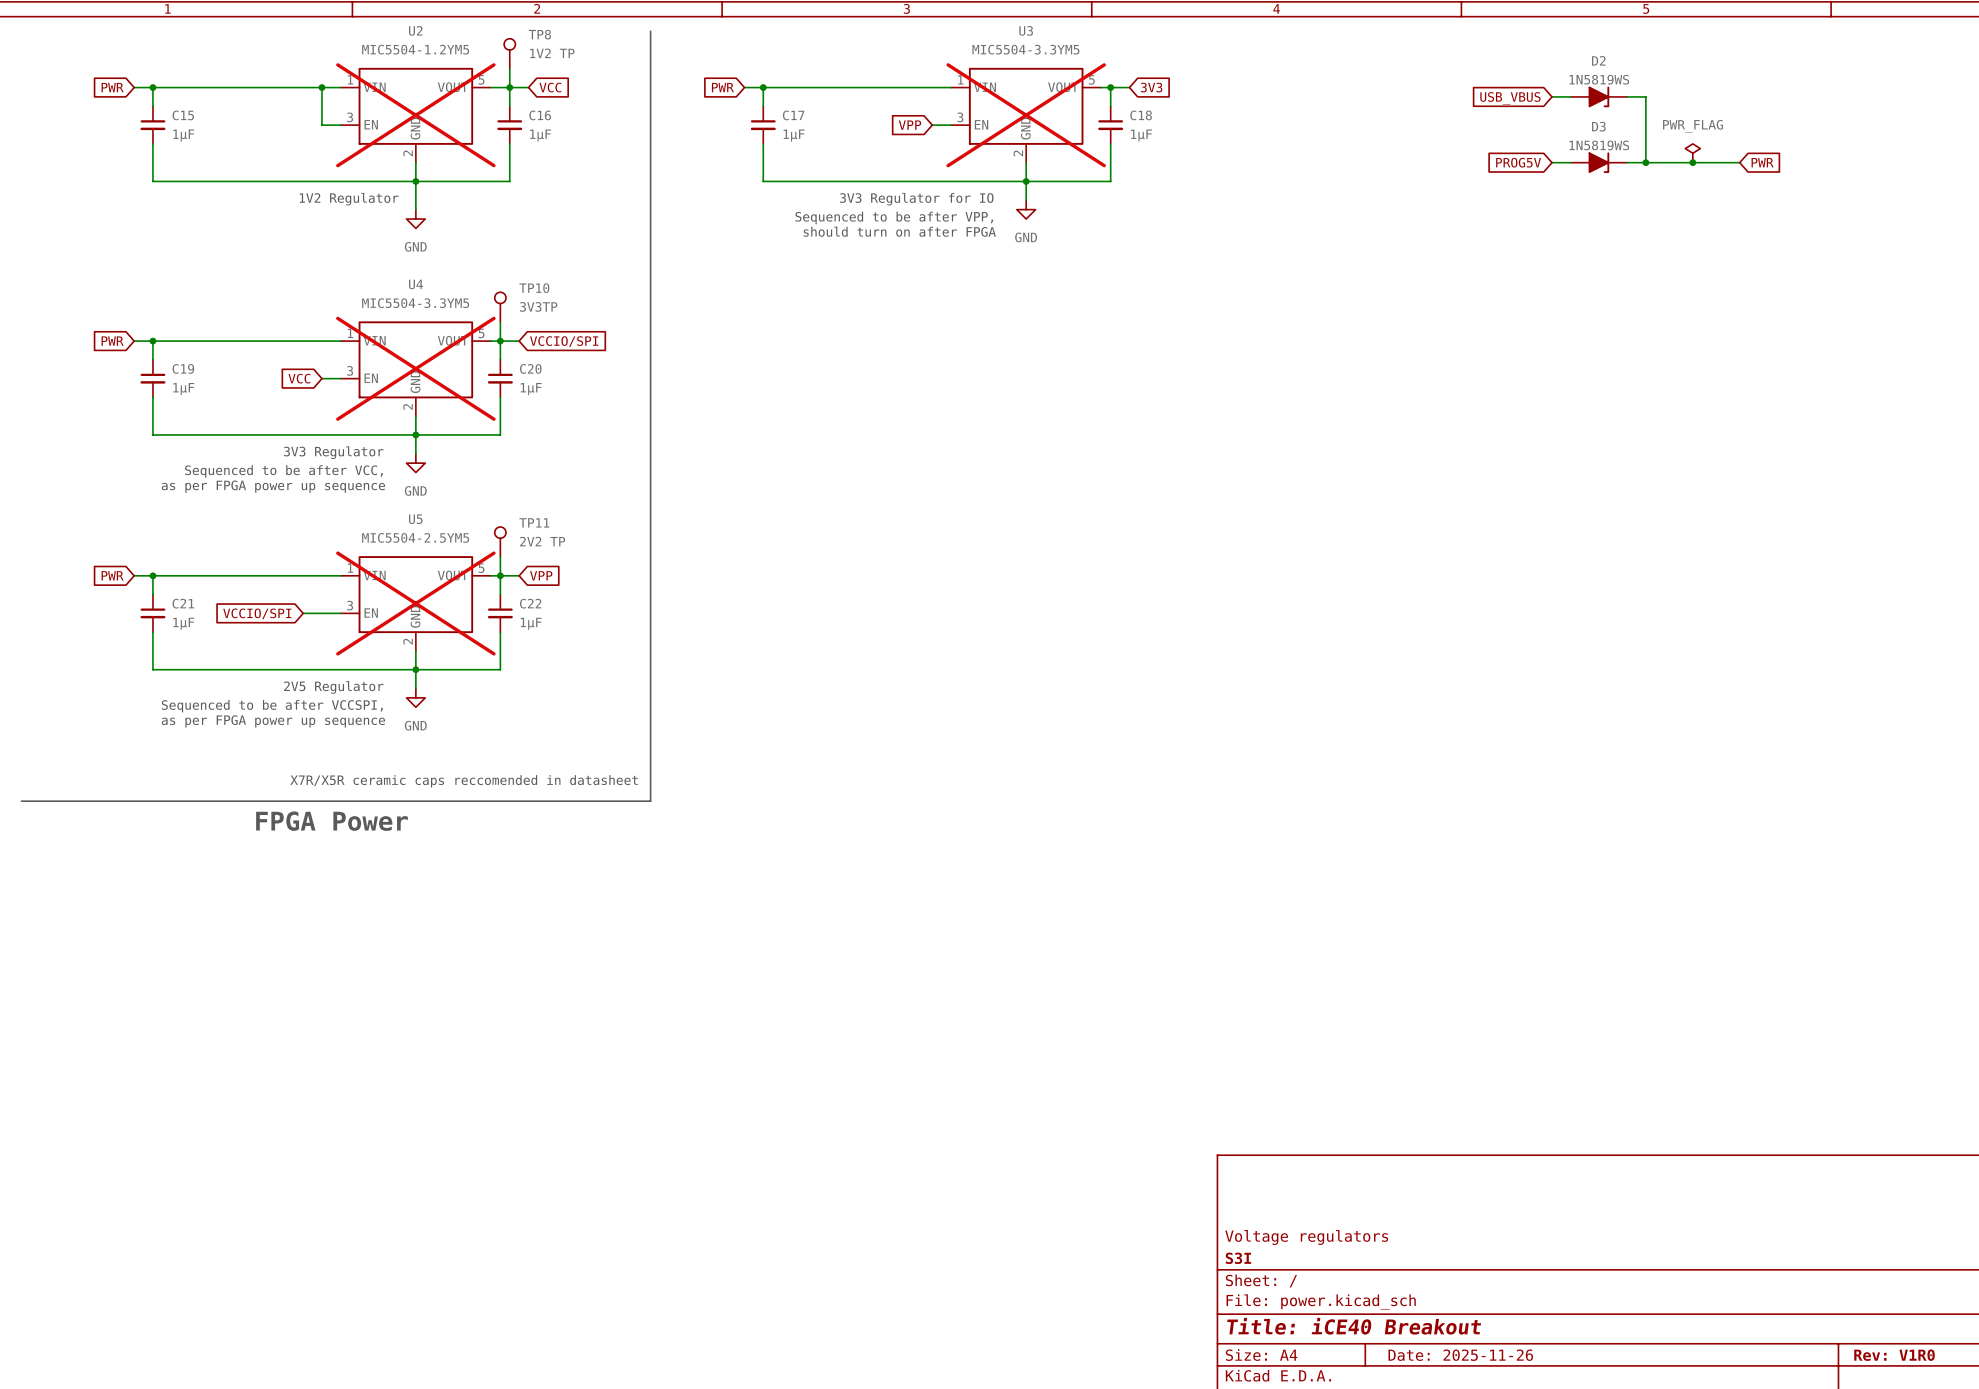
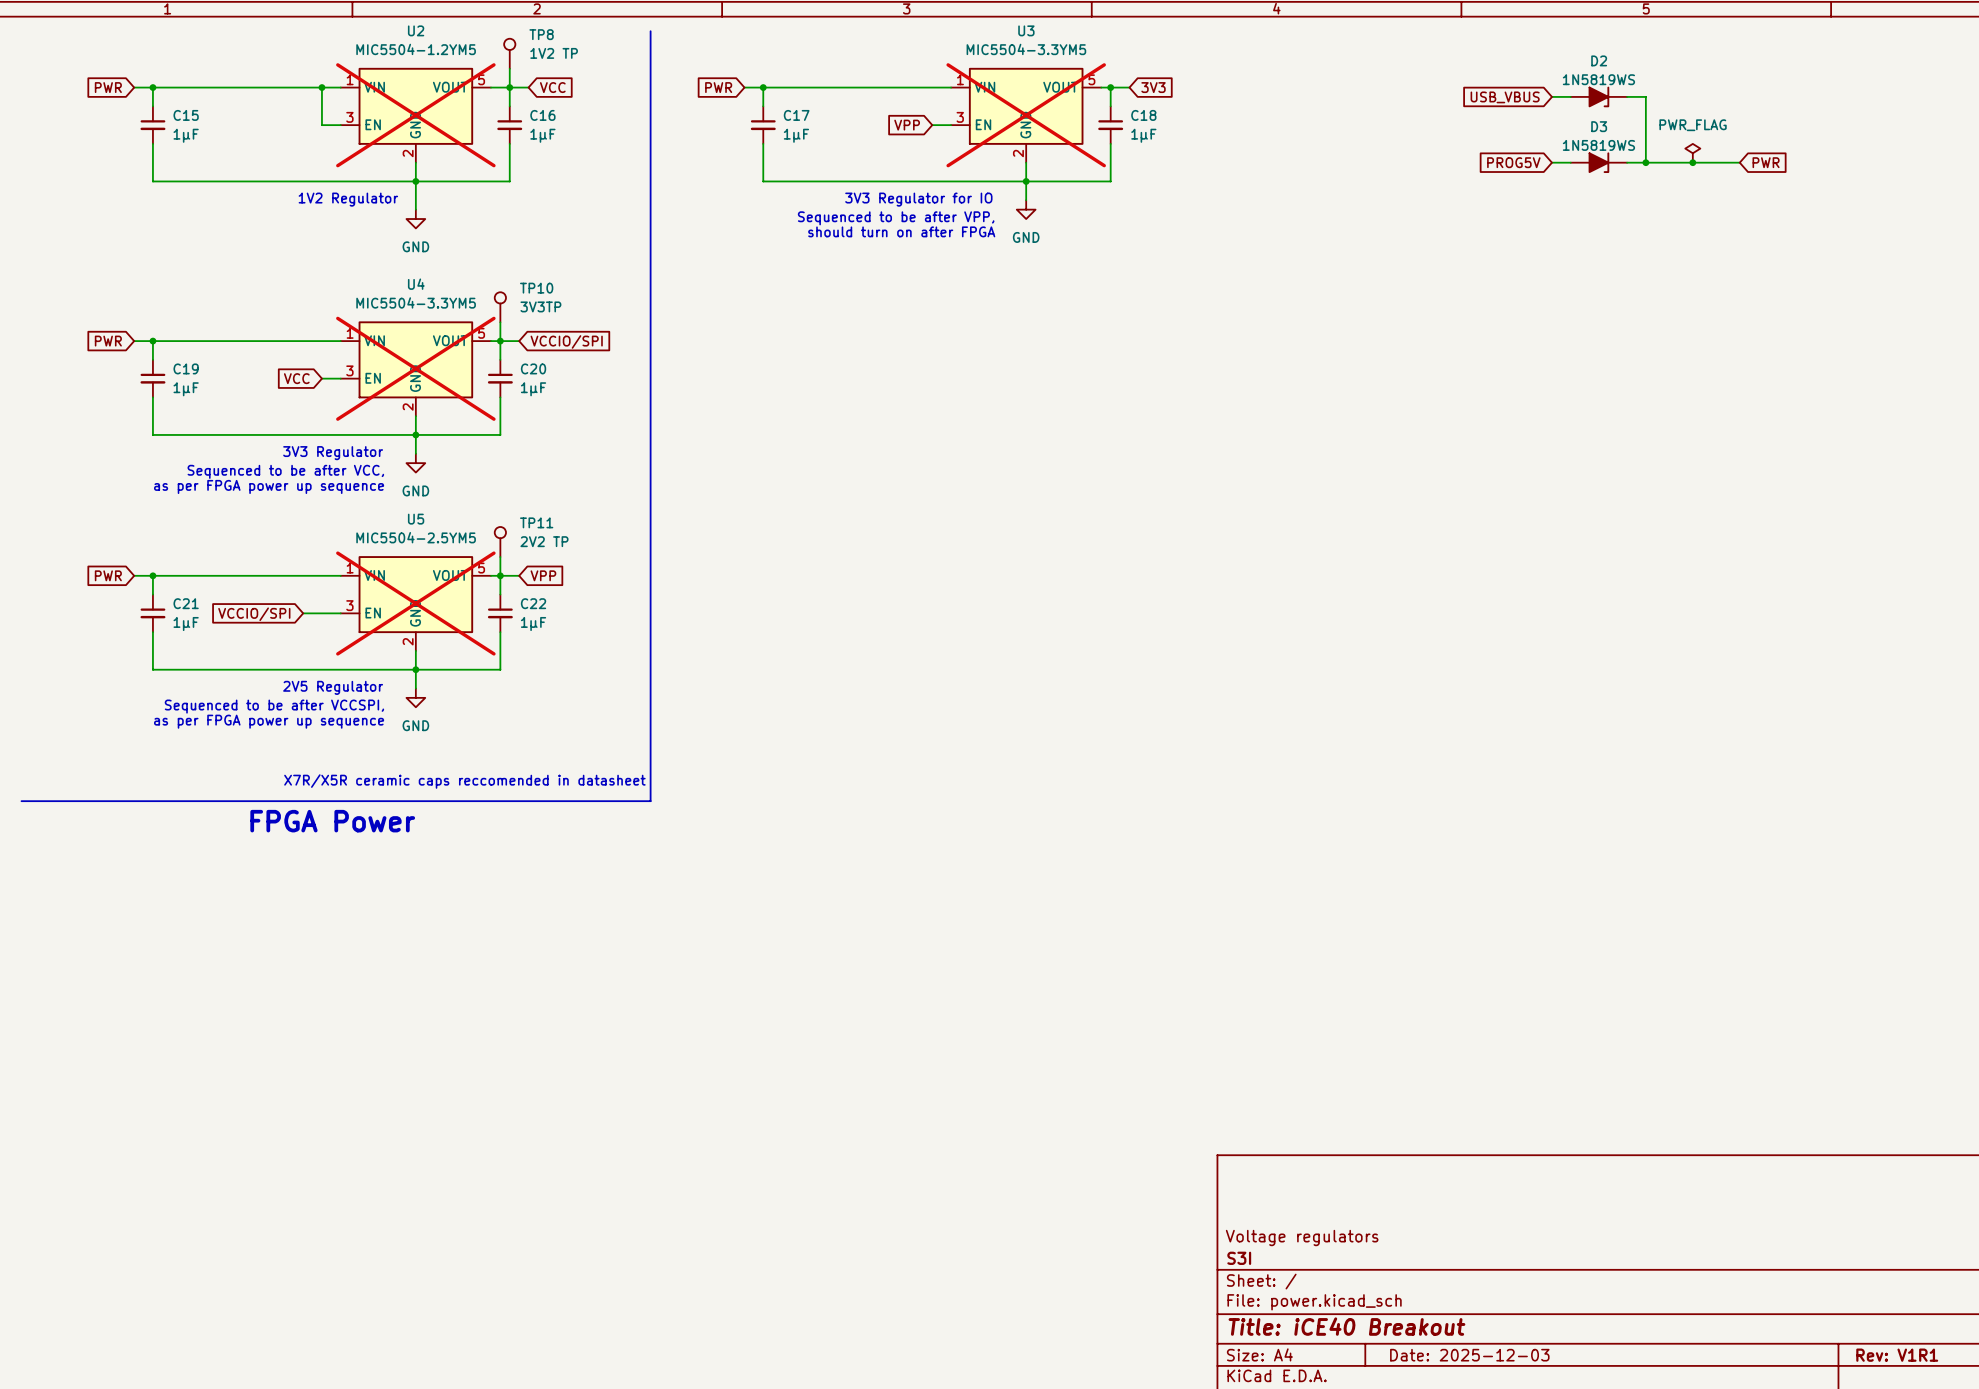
title block: Date: 2025-11-26 (1460, 1355) -> Date: 2025-12-03 (1469, 1355)
title block: Rev: V1R0 (1894, 1355) -> Rev: V1R1 (1897, 1355)

